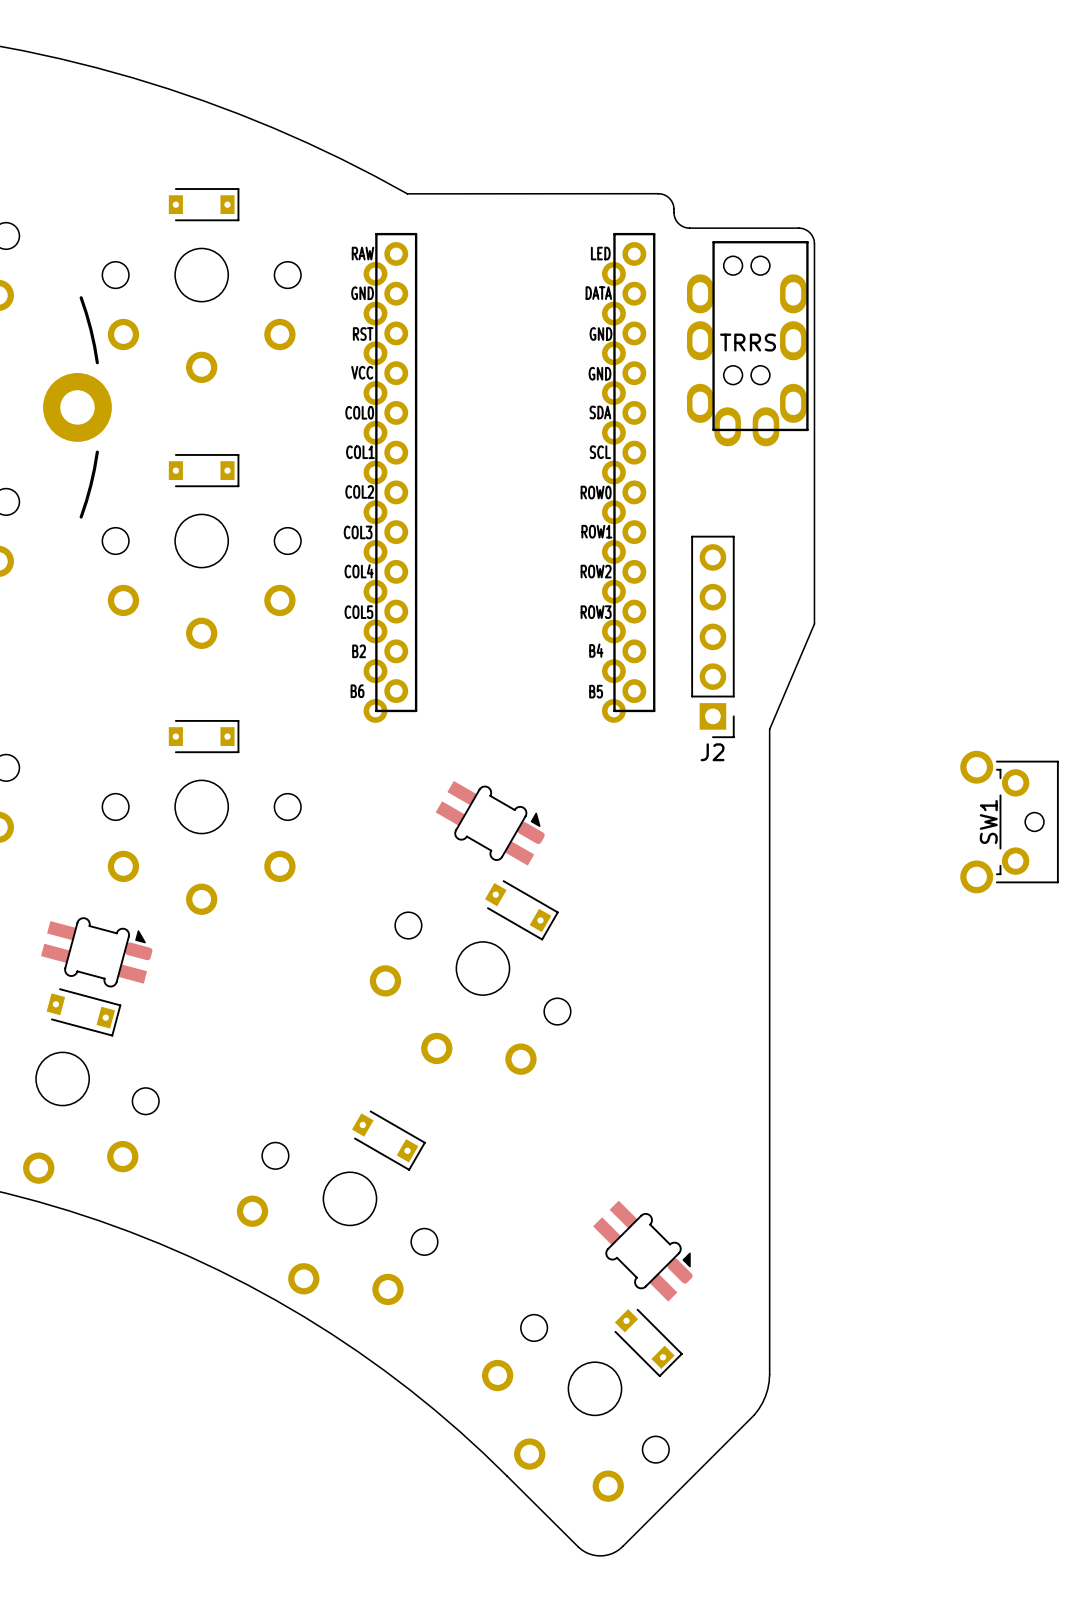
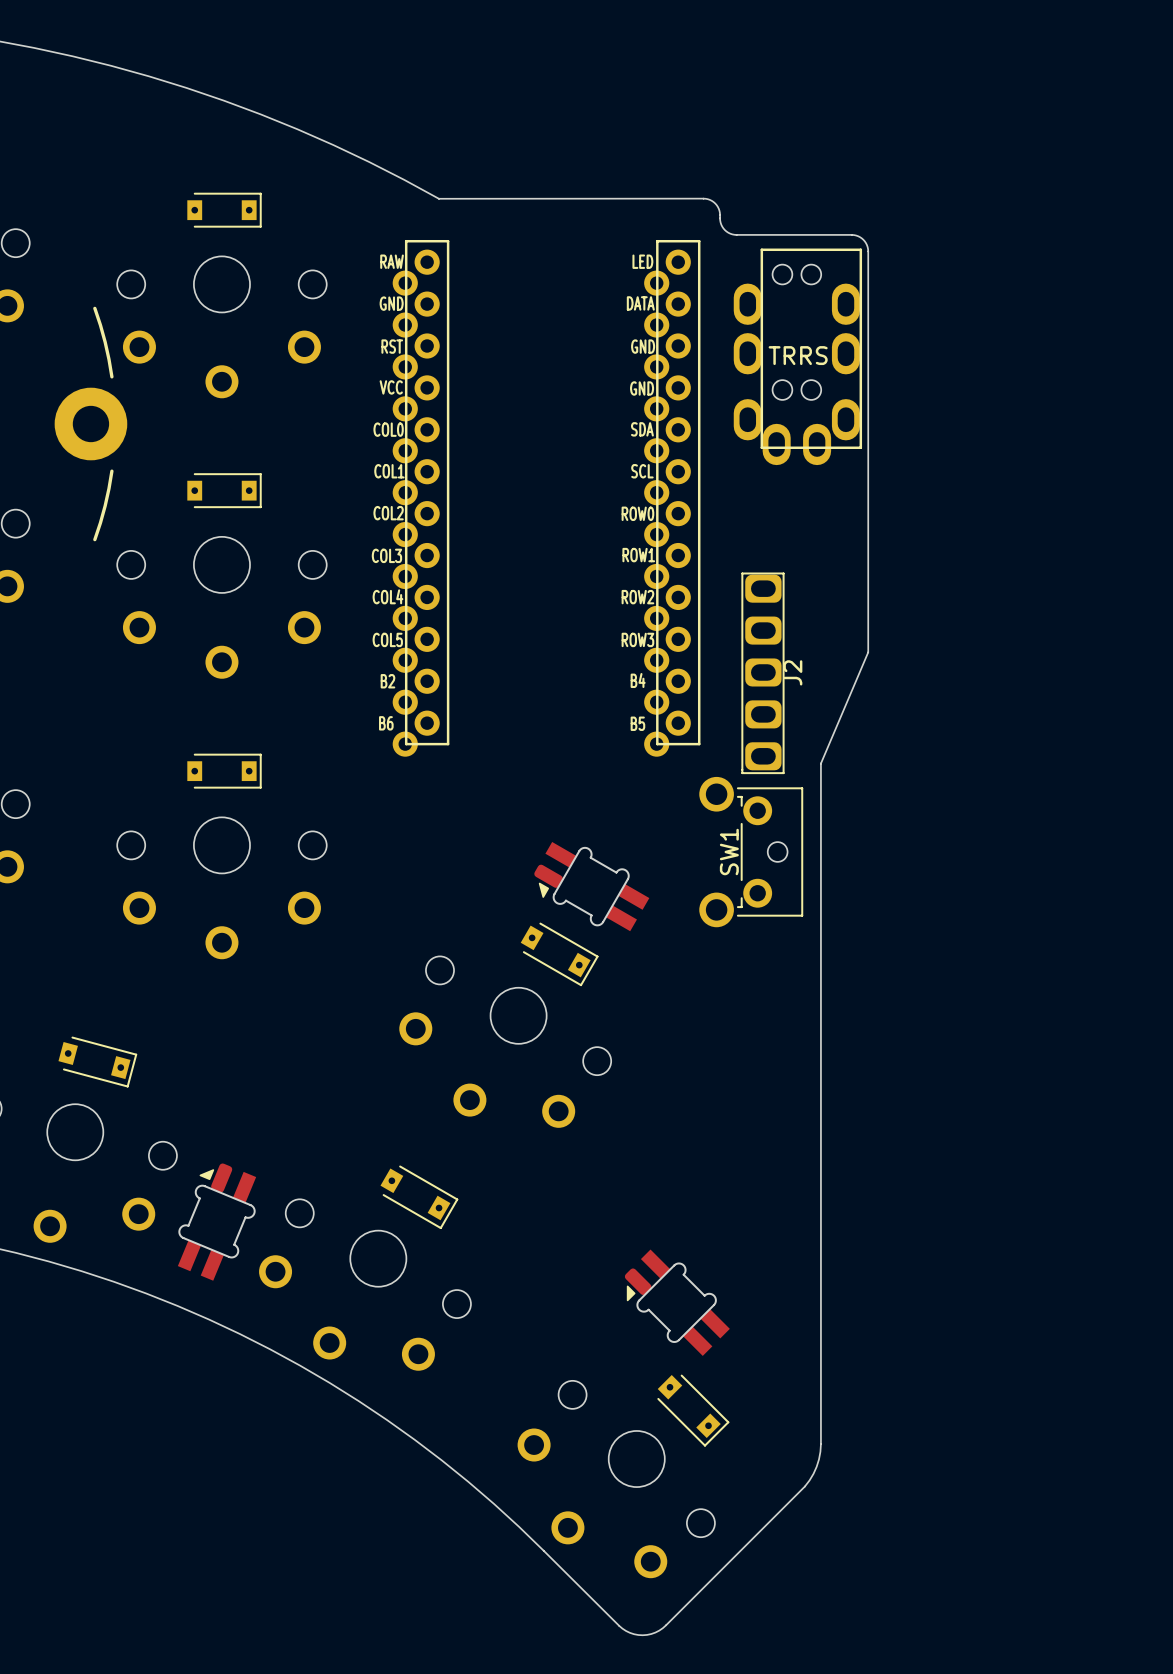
J2 footprint: [691, 535, 735, 739] -> [741, 572, 785, 775]
J2 name position: J2 (712, 752) -> J2 (792, 672)
SW1 position: (1009, 822) -> (751, 852)
part rotation: 0° (490, 823) -> 180° (591, 886)
part position: (490, 823) -> (591, 886)
part: (96, 952) -> none
part: none -> (217, 1222)
part rotation: 0° (642, 1251) -> 180° (677, 1302)

